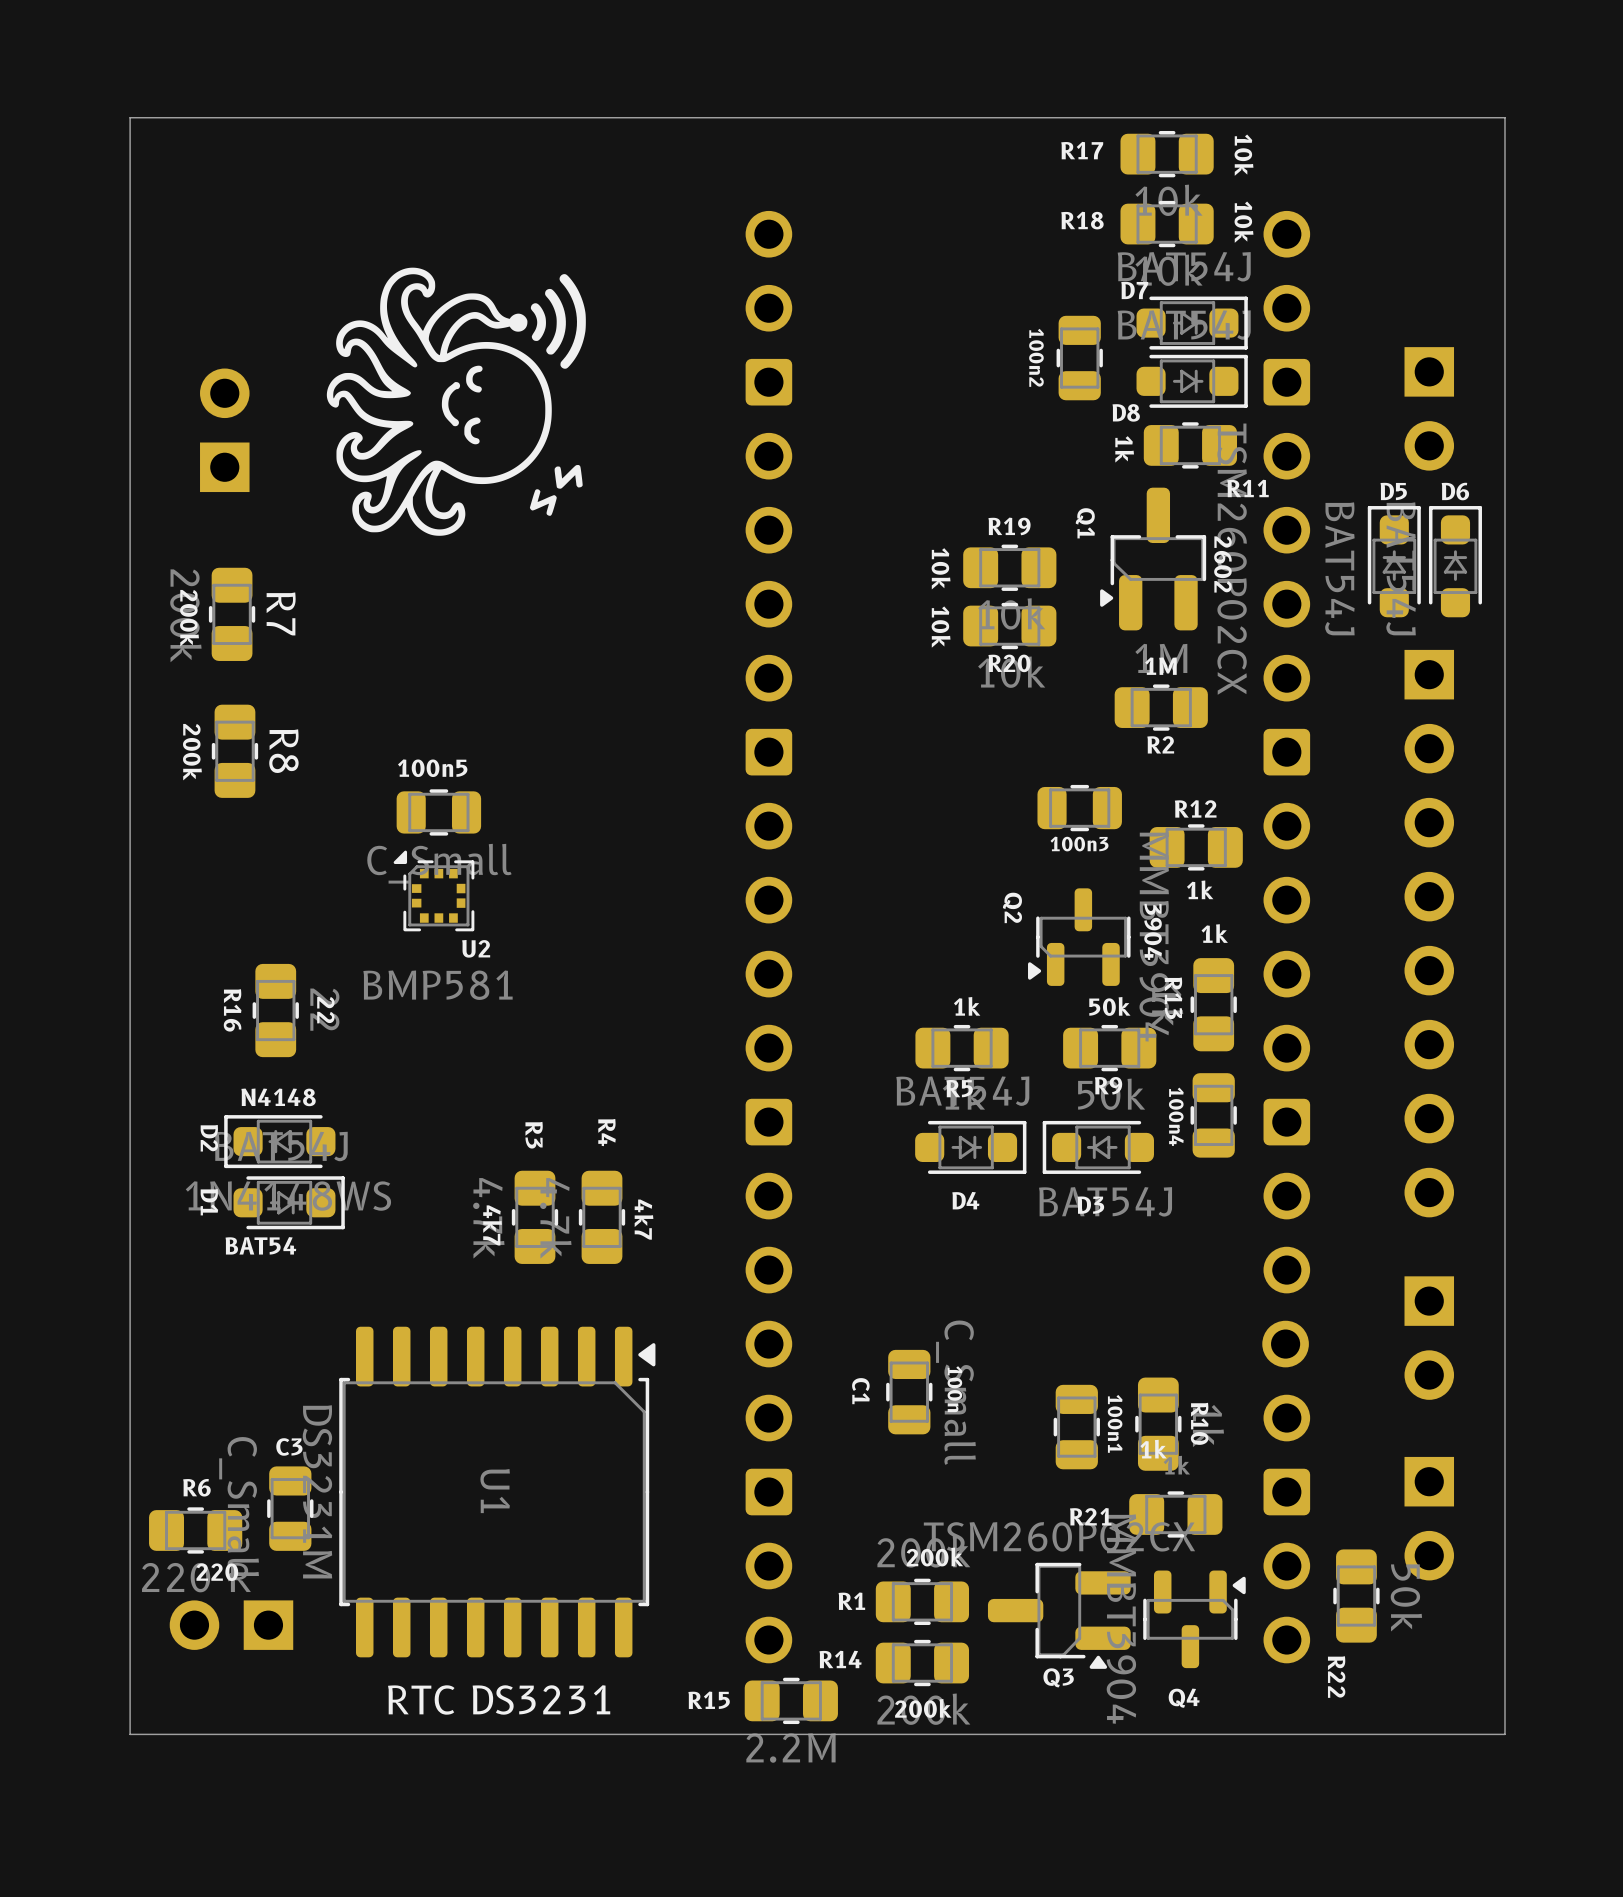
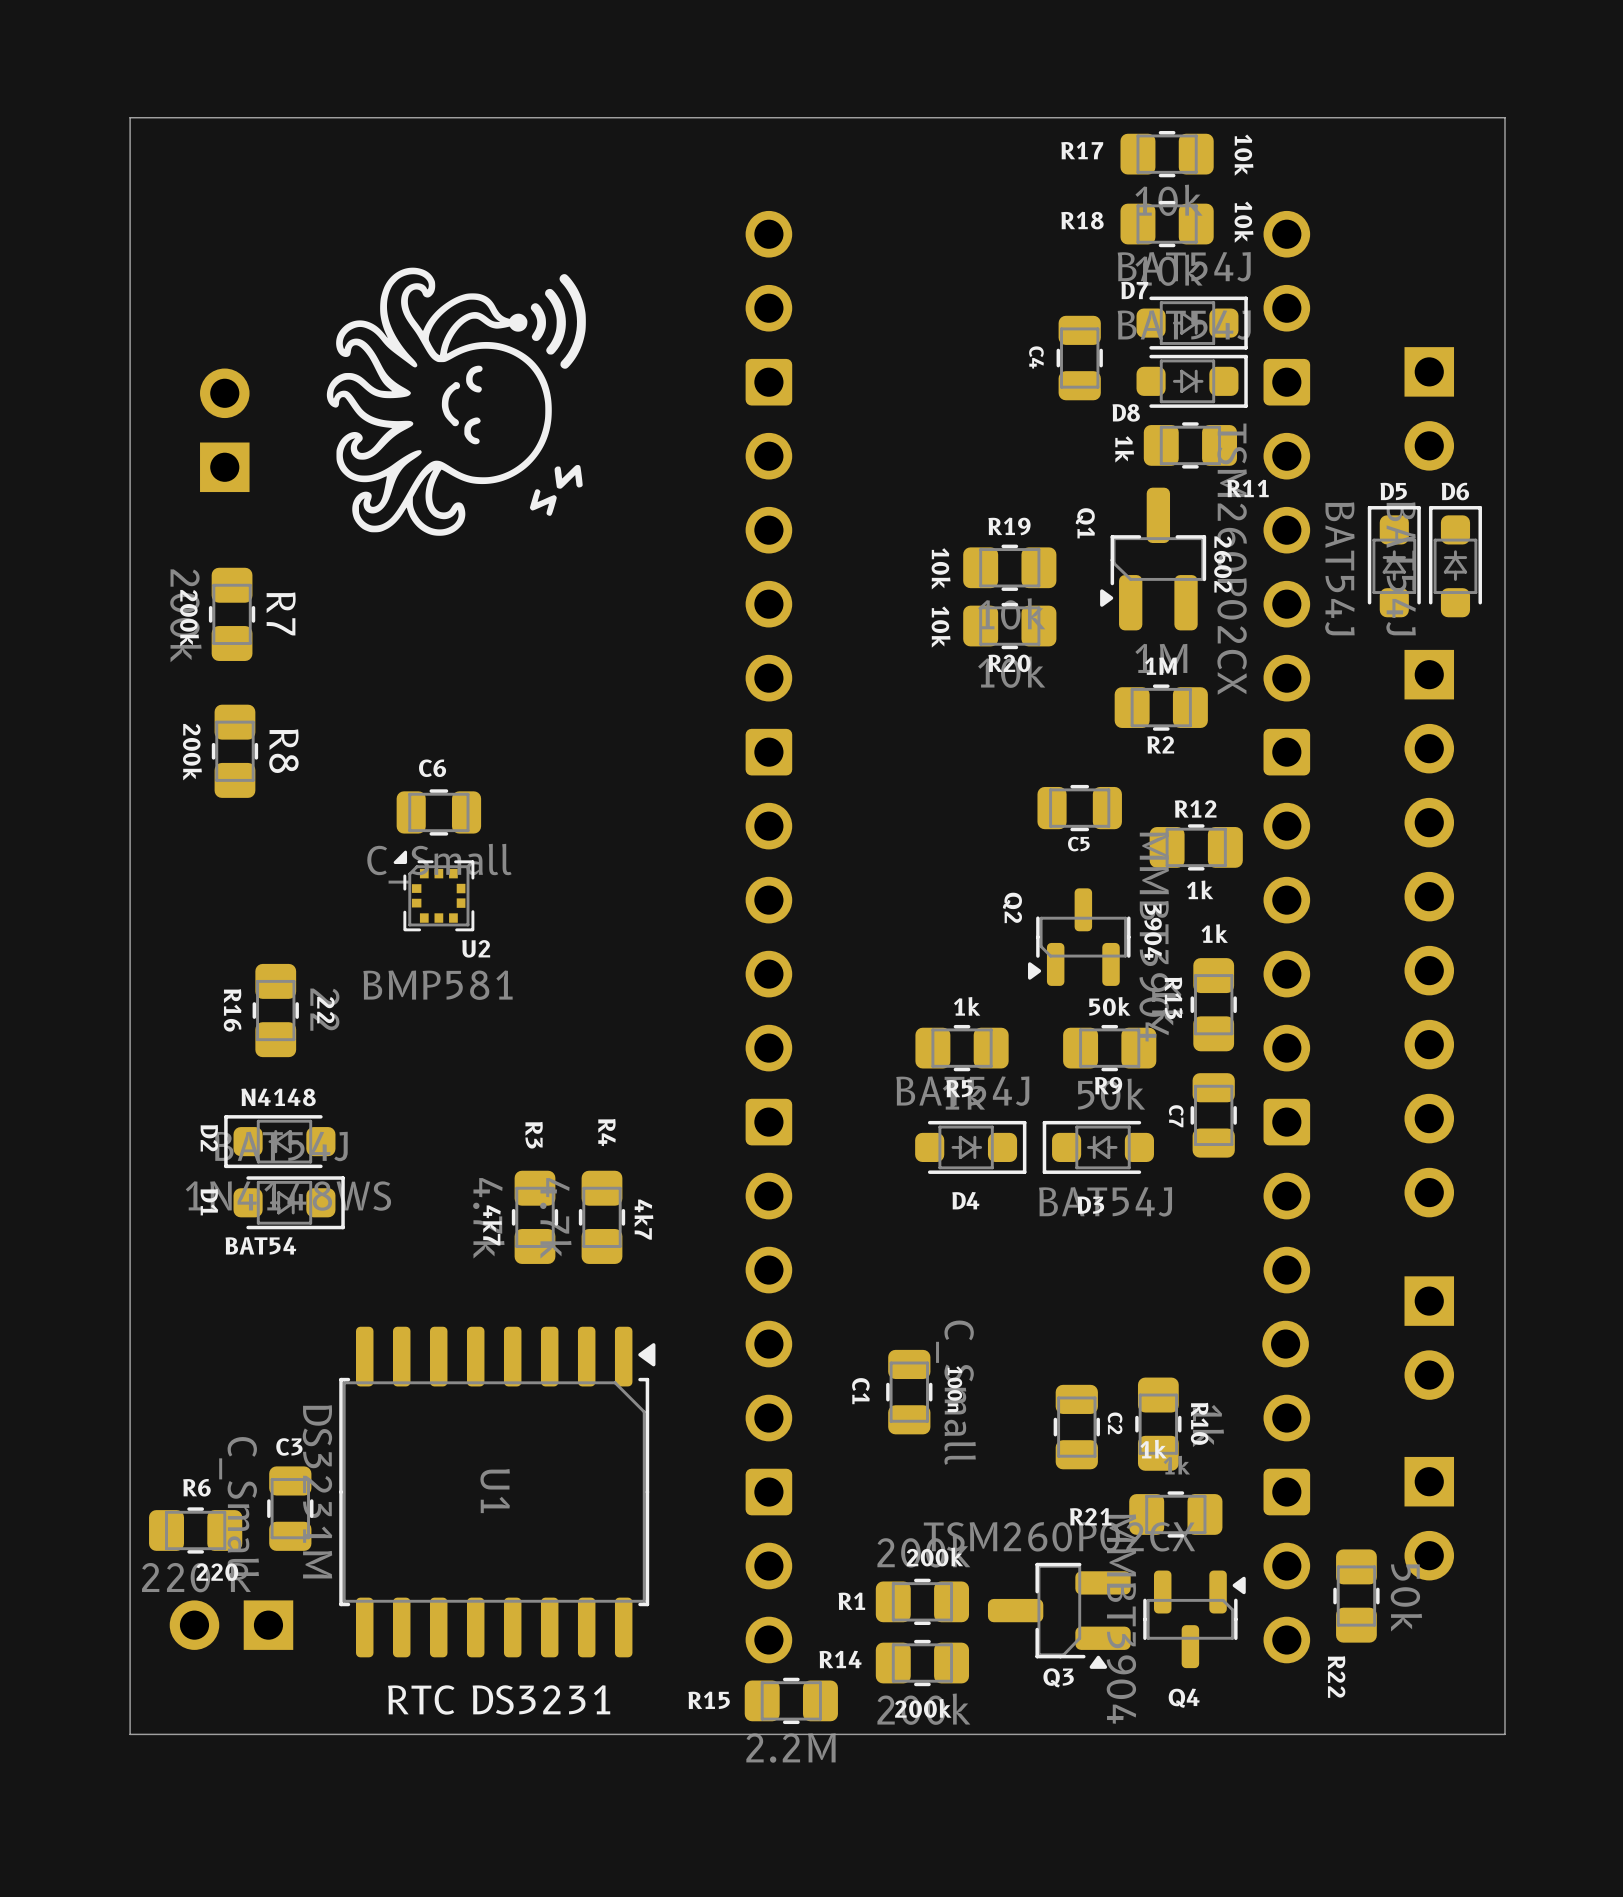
100n2 name: 100n2 (1036, 357) -> C4 (1036, 357)
100n5 name: 100n5 (432, 768) -> C6 (432, 768)
100n3 name: 100n3 (1079, 844) -> C5 (1078, 844)
100n4 name: 100n4 (1176, 1116) -> C7 (1176, 1116)
100n1 name: 100n1 (1115, 1423) -> C2 (1115, 1423)

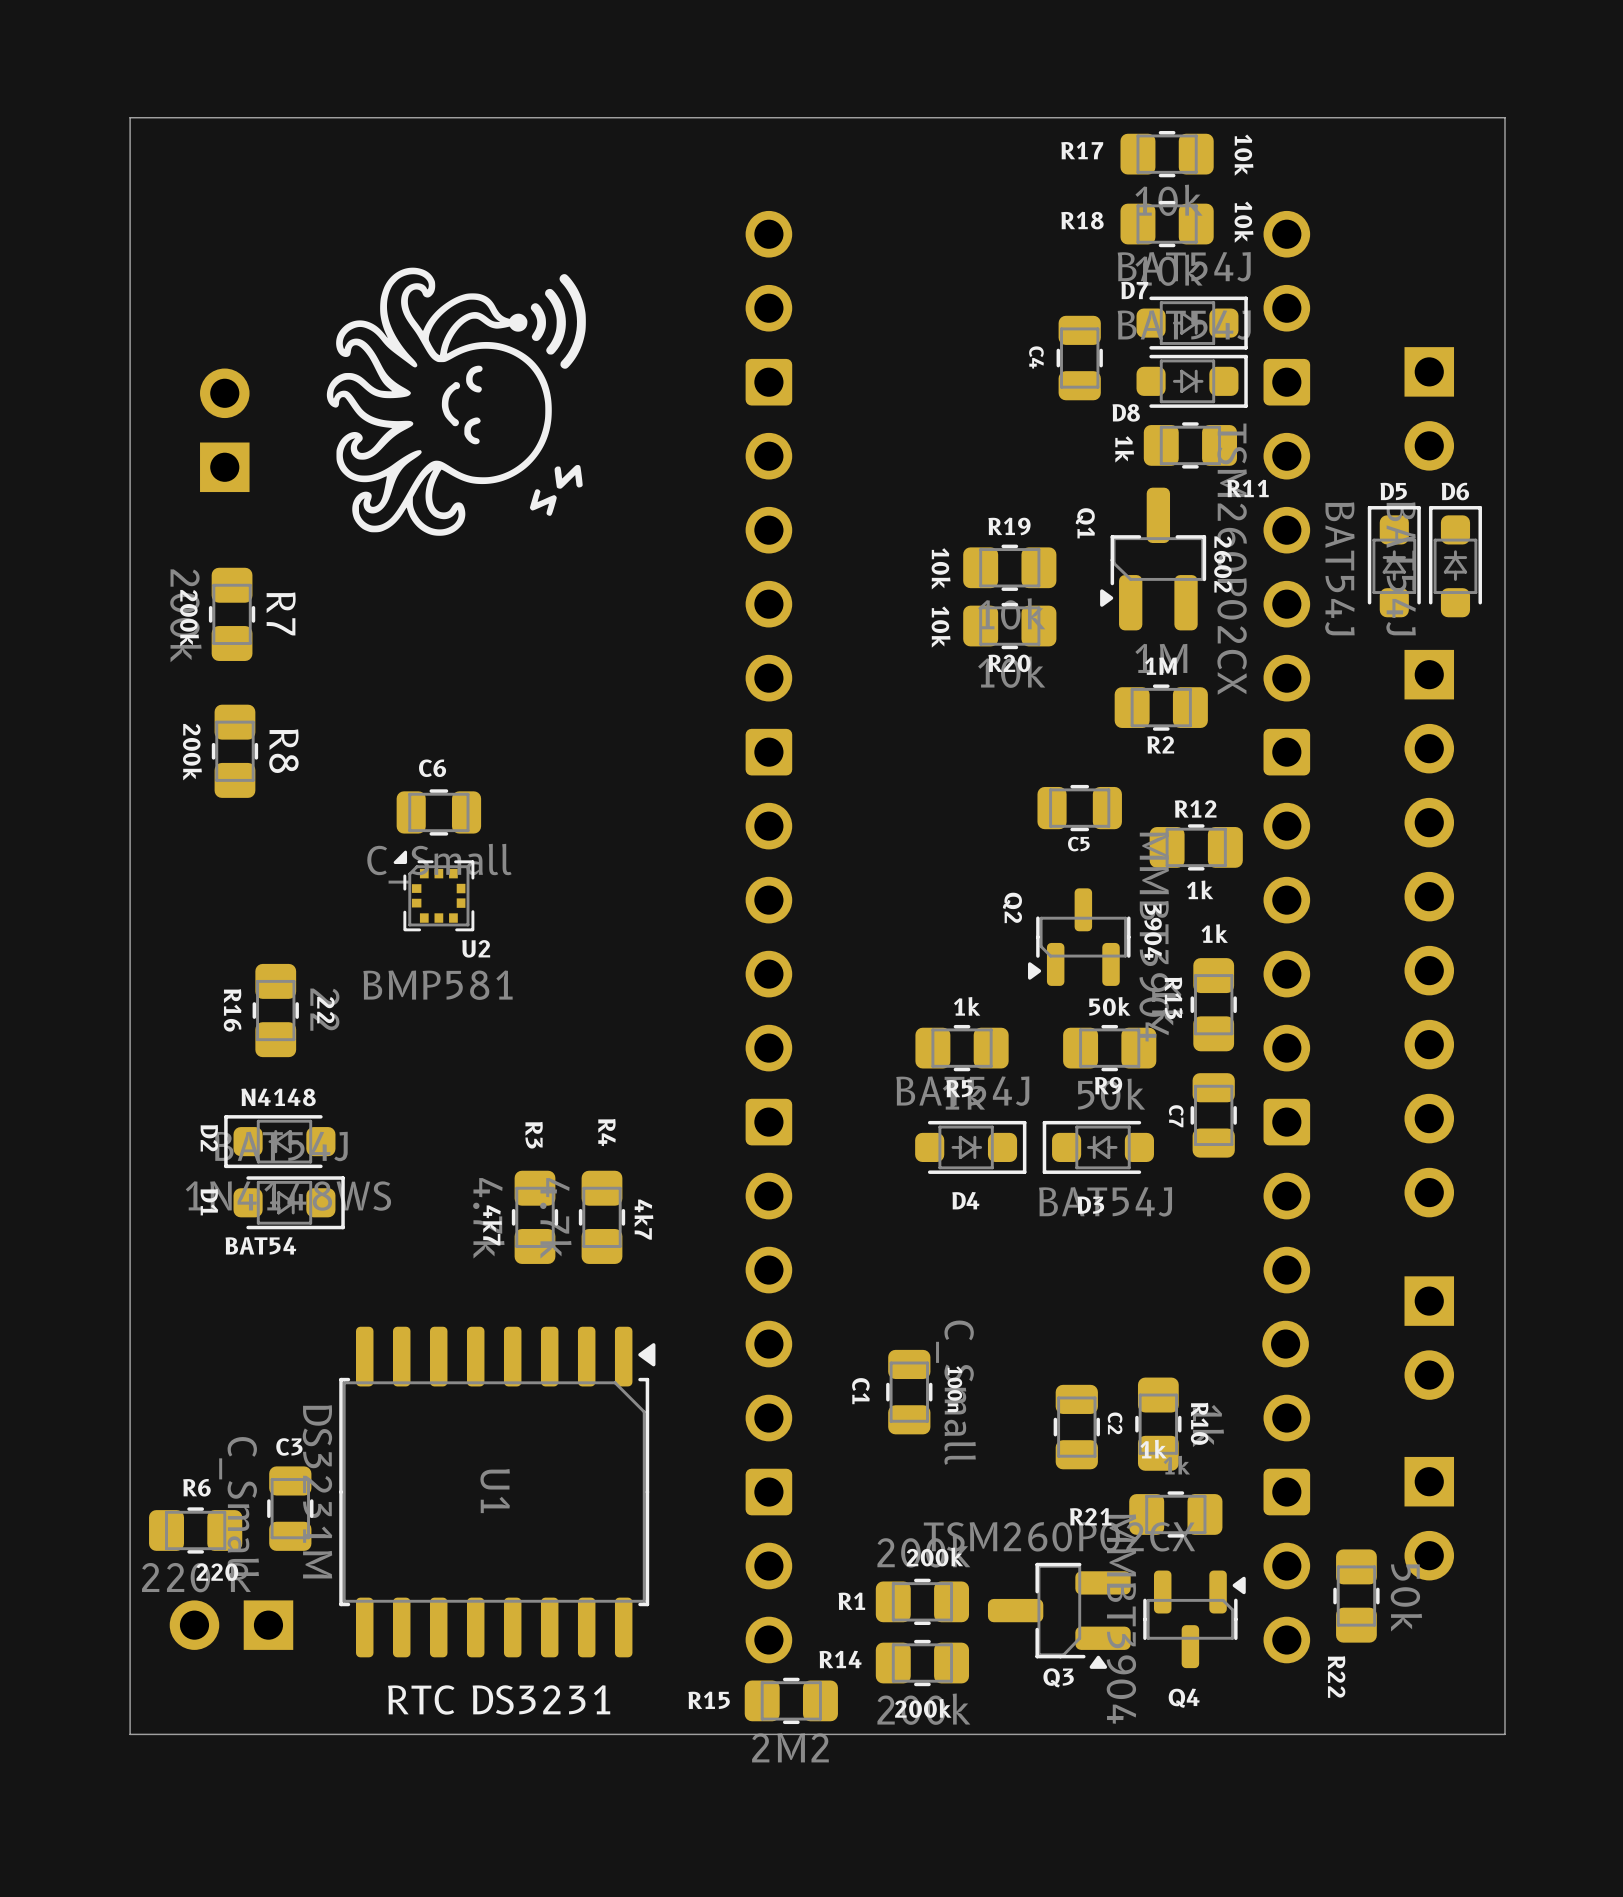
R15 value: 2.2M (790, 1748) -> 2M2 (790, 1747)

